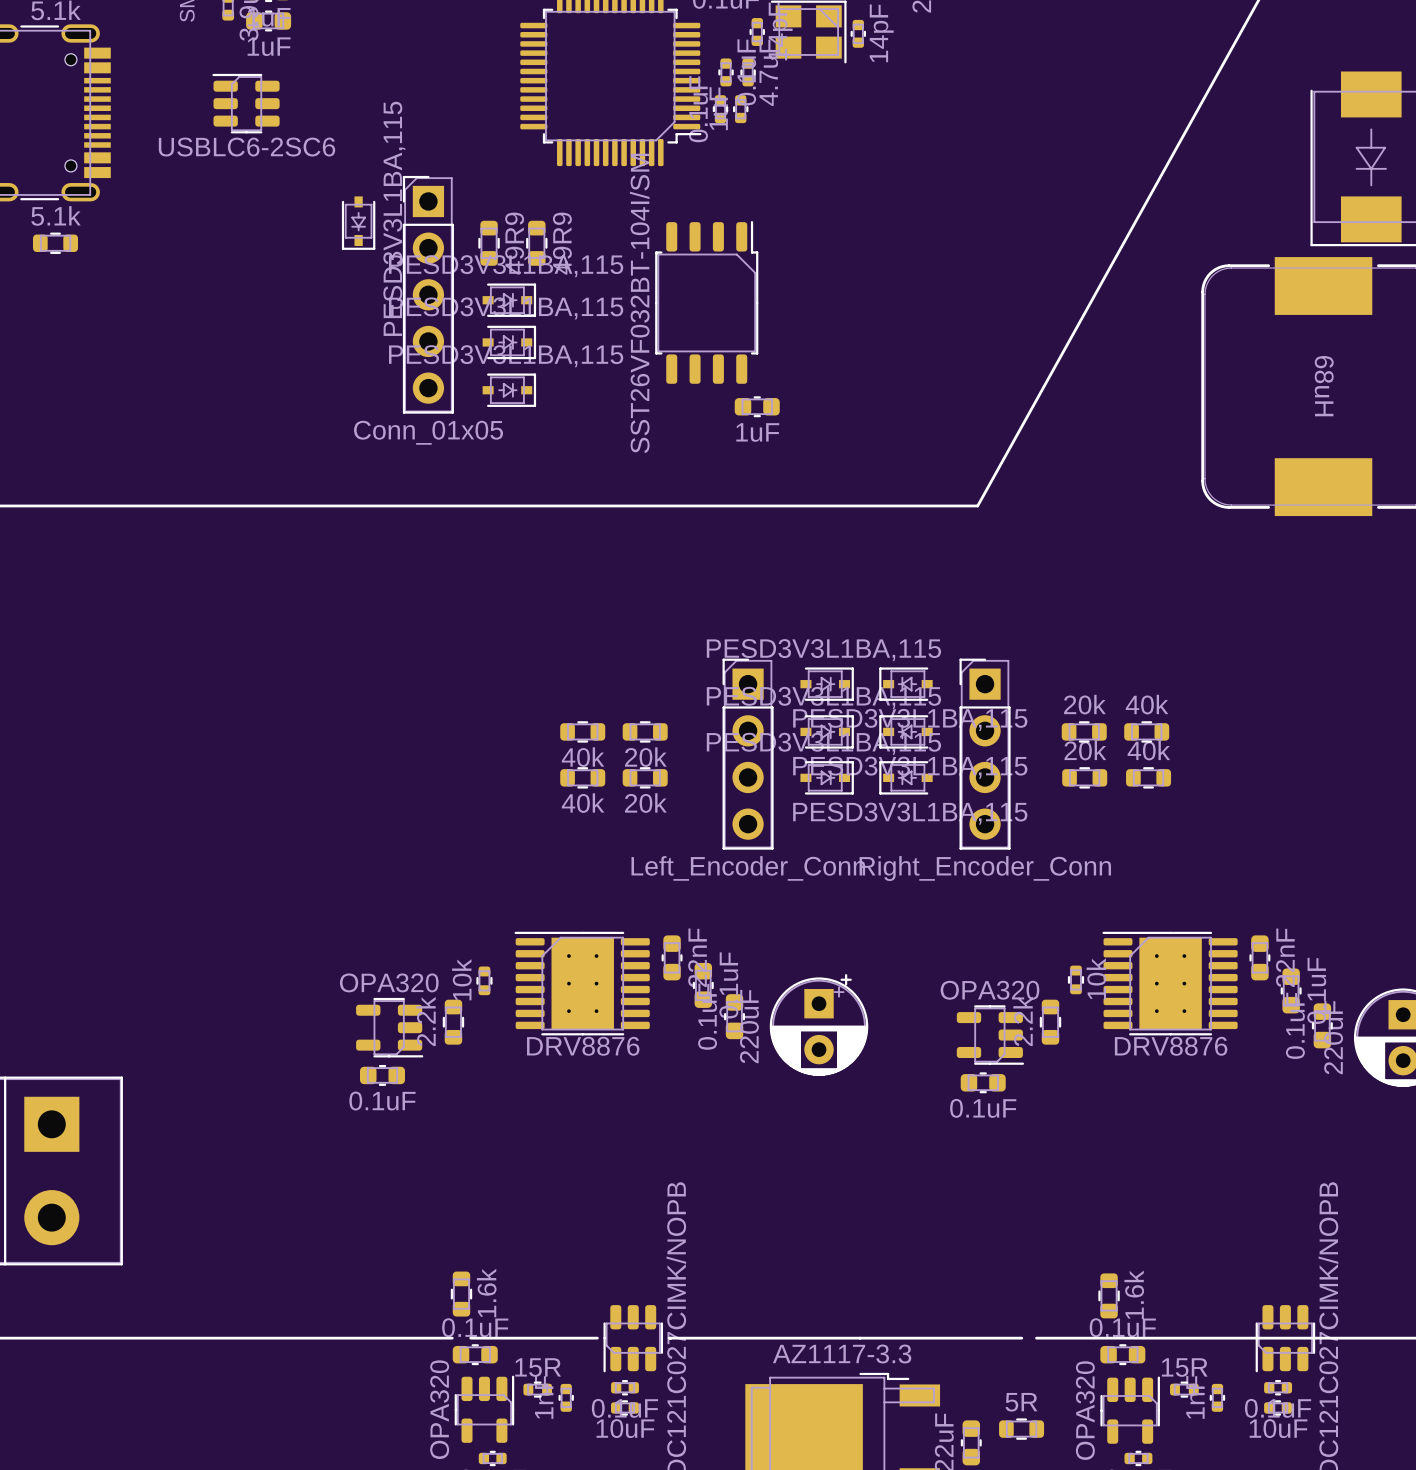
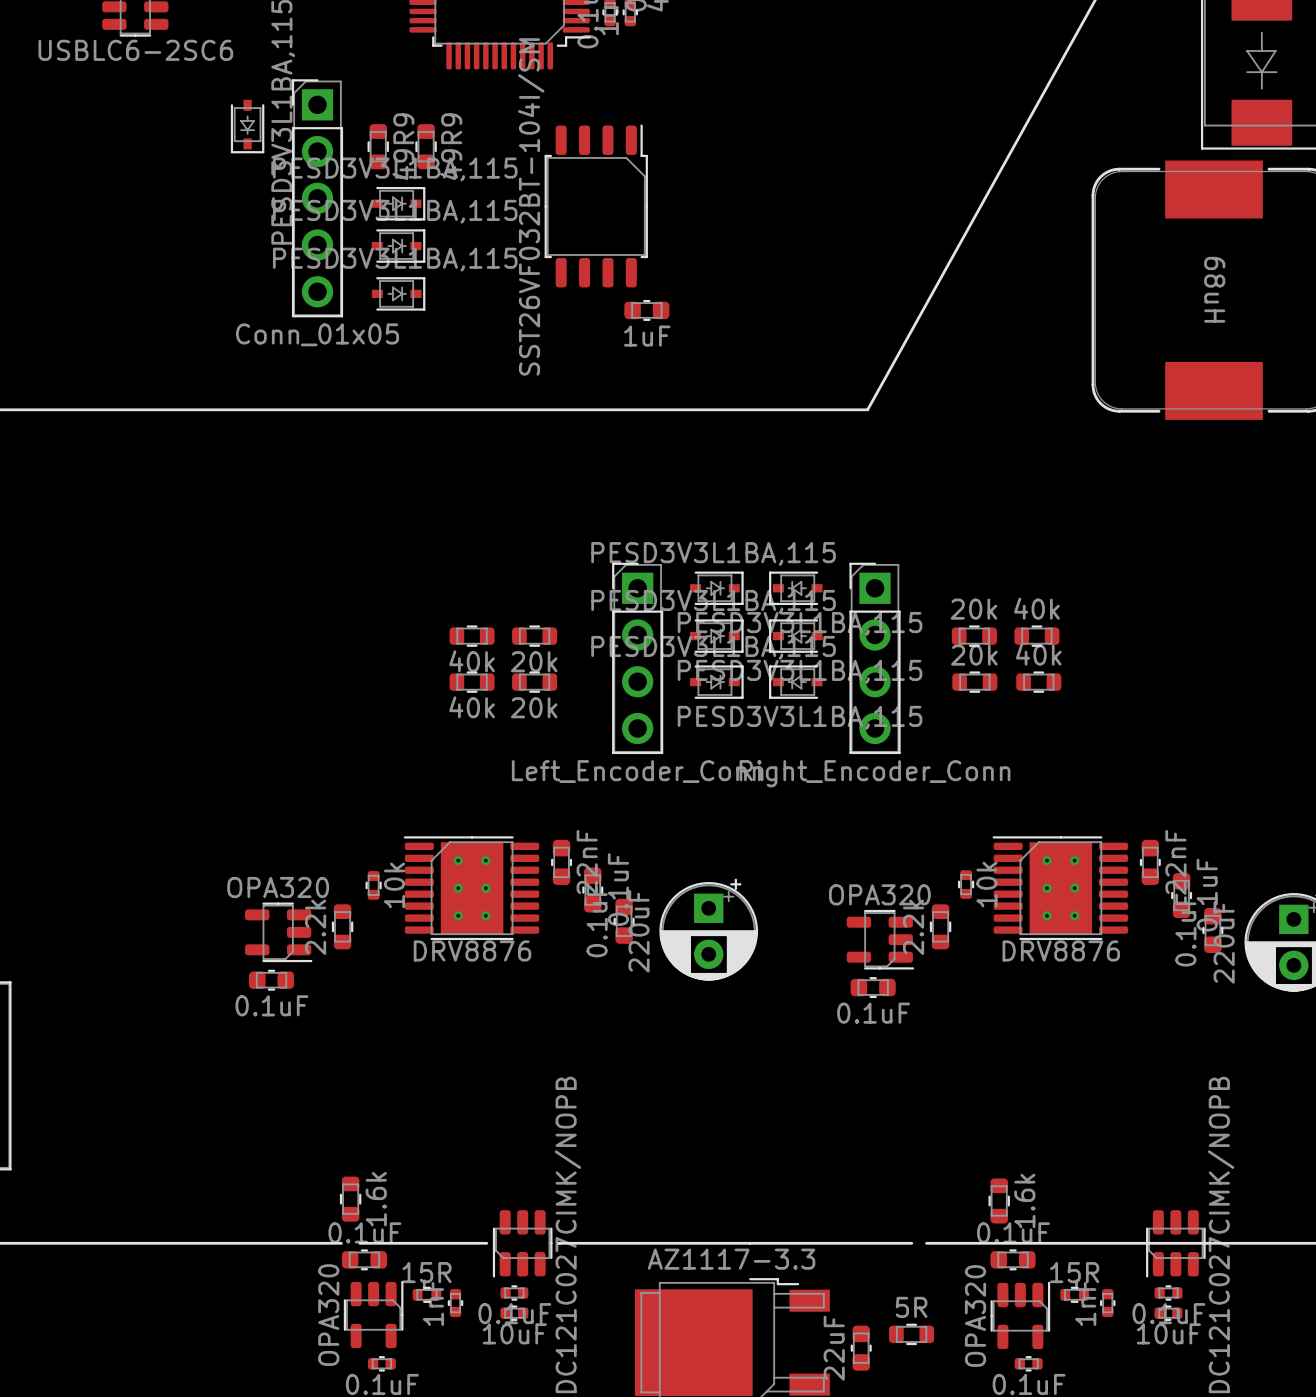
part value position: 10k (461, 979) -> 10k (394, 885)

